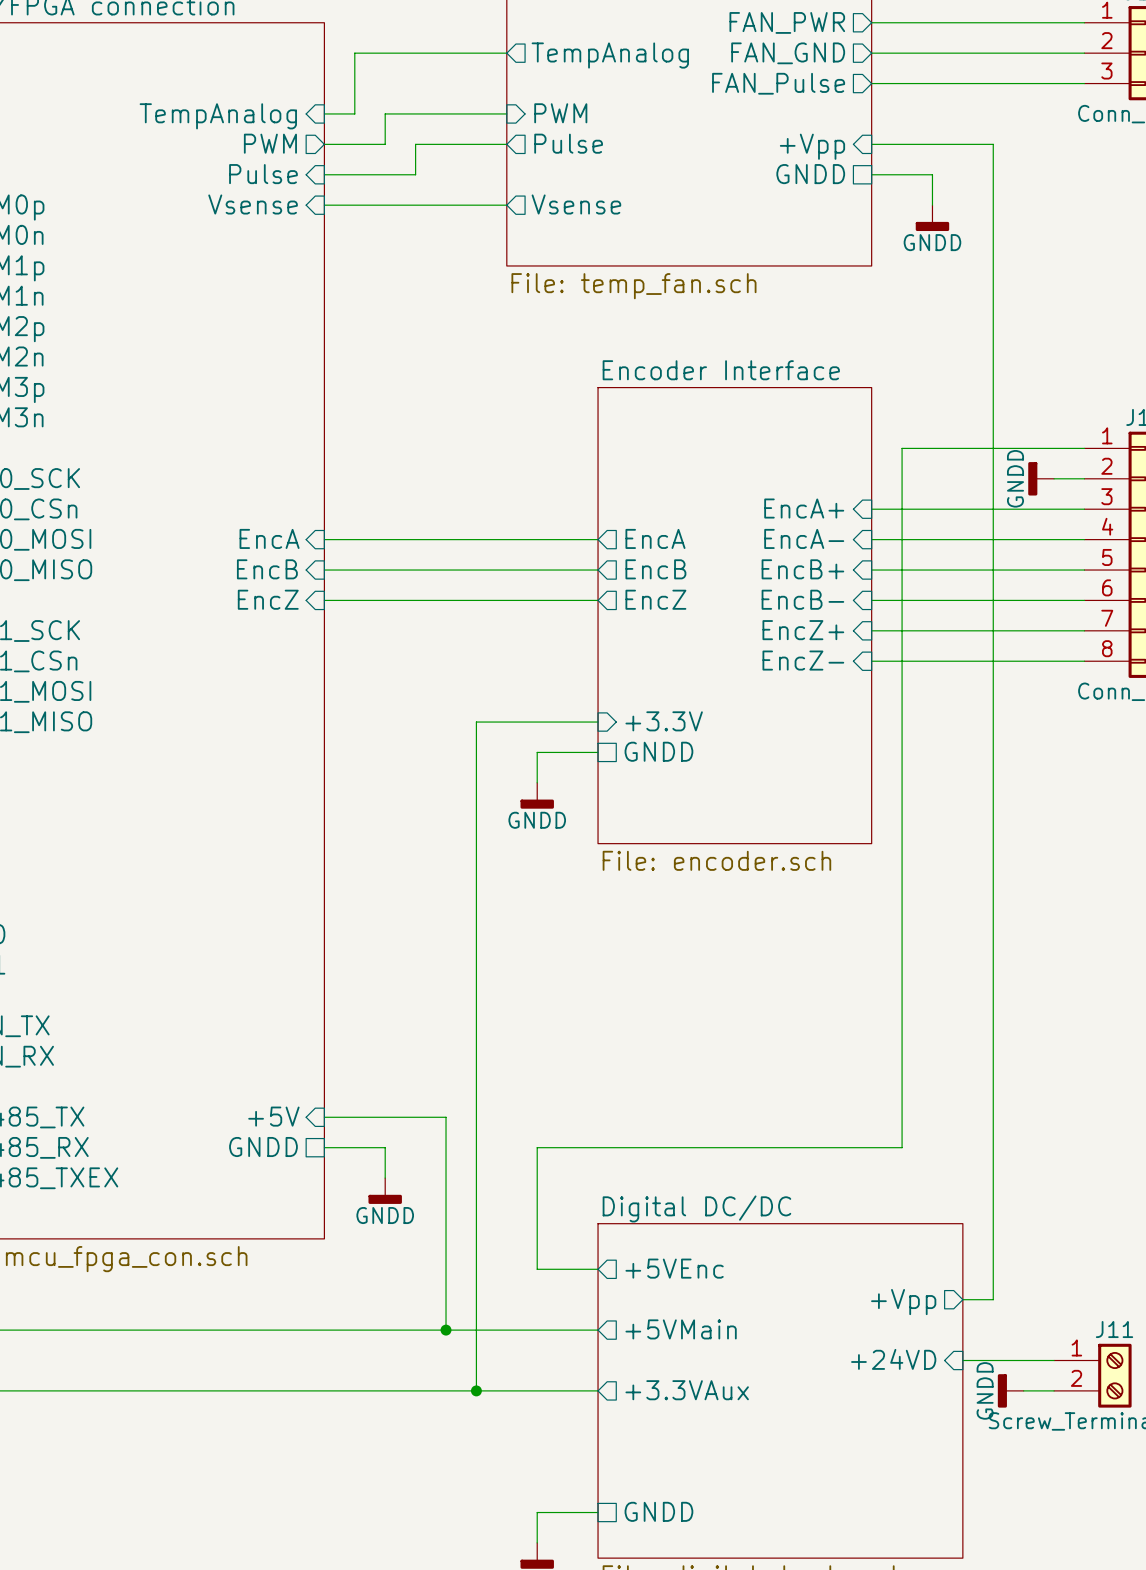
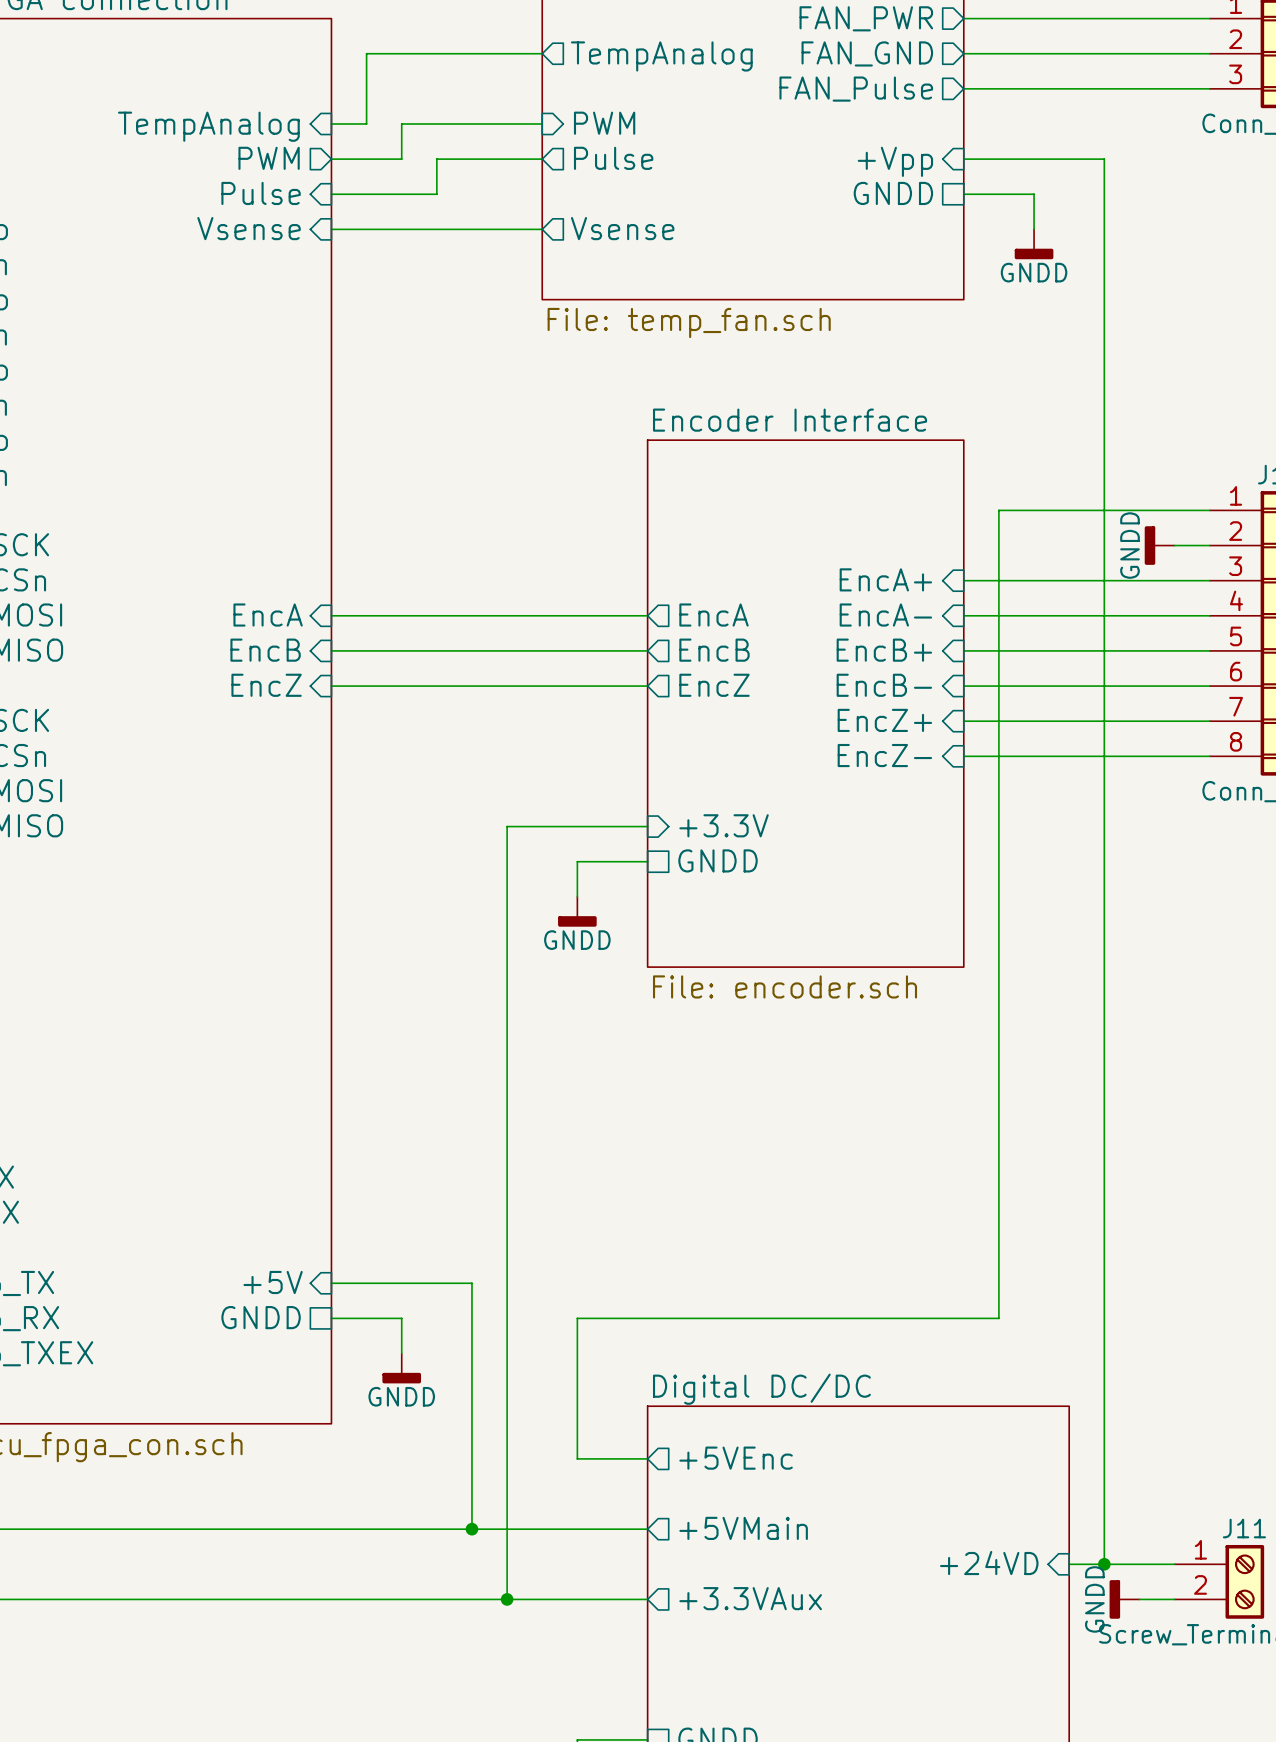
wire: (962, 1299) (993, 1299) -> (1104, 1564) (1104, 1494)
sheet pin: +Vpp (903, 1302) -> none
junction: none -> (1104, 1564)

